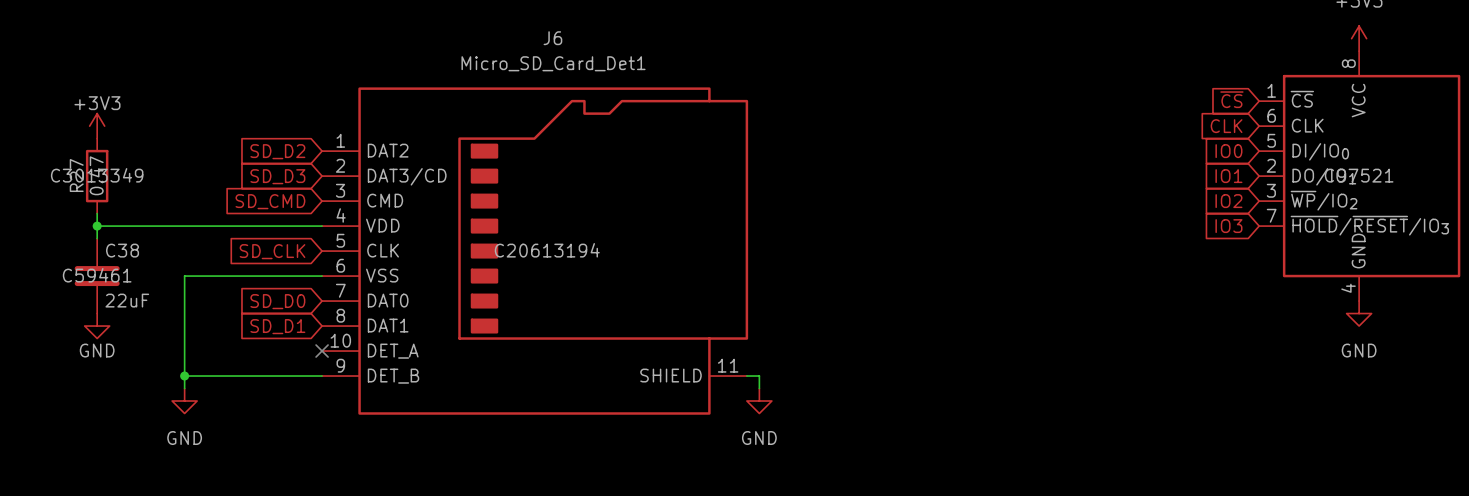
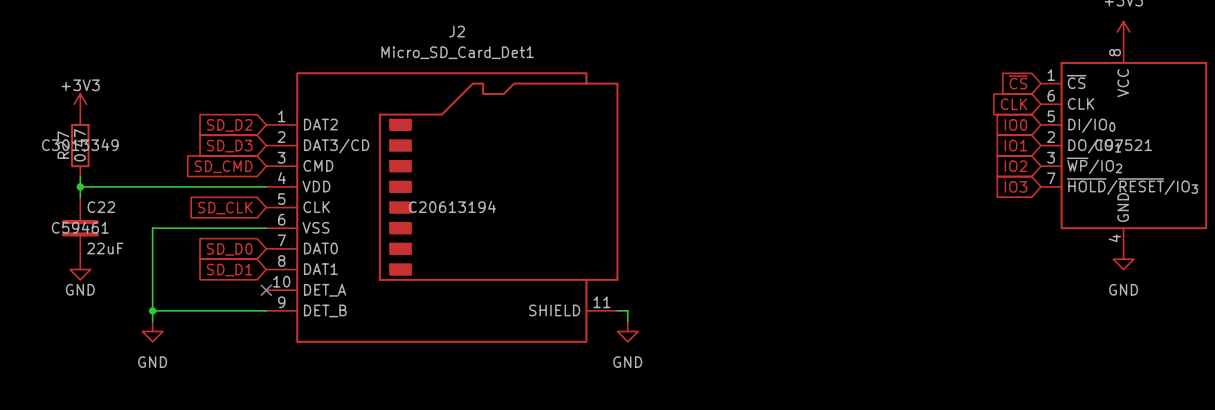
J6 name: J6 (552, 38) -> J2 (457, 31)
C38 name: C38 (122, 250) -> C22 (101, 207)

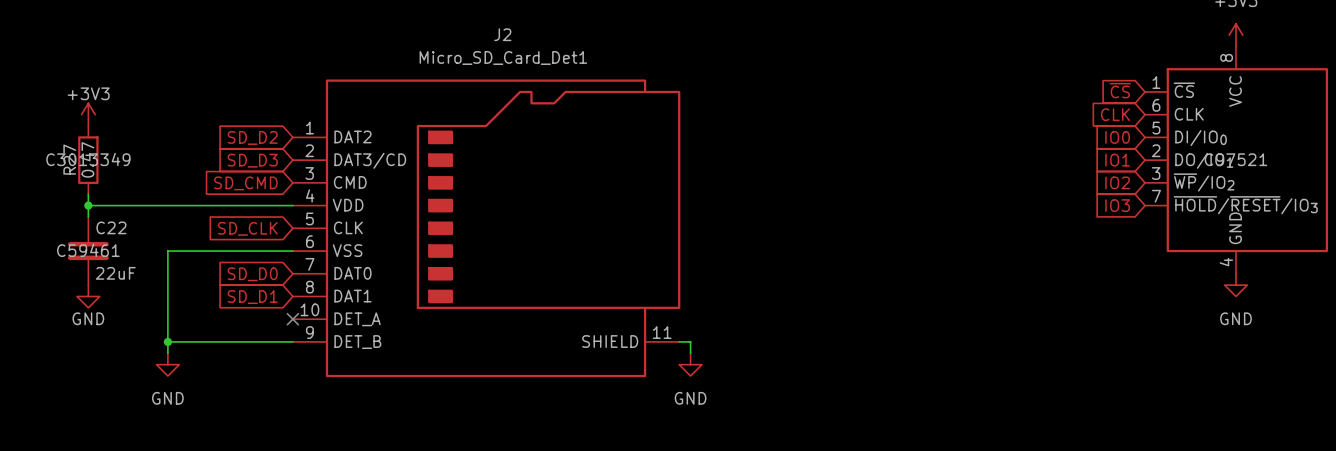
J2 text: C20613194 (452, 206) -> none

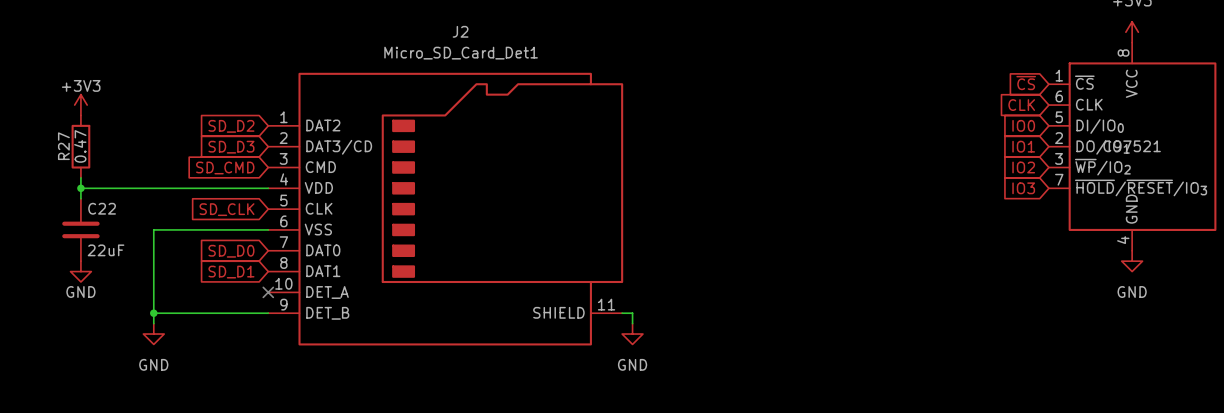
R27 text: C3013349 (88, 159) -> none
C22 text: C59461 (88, 250) -> none

